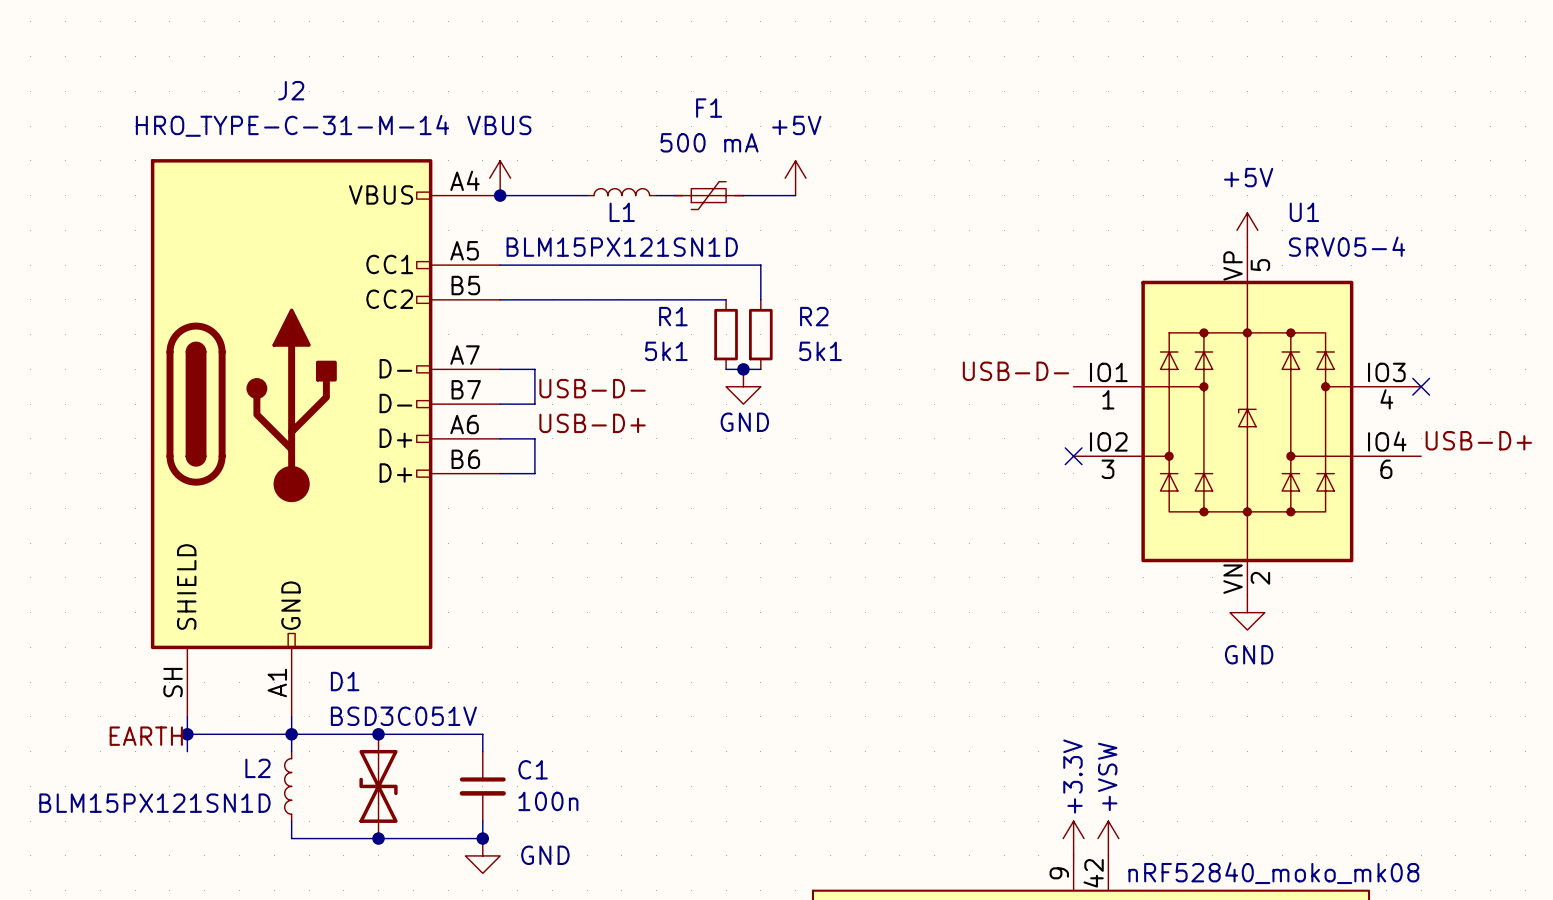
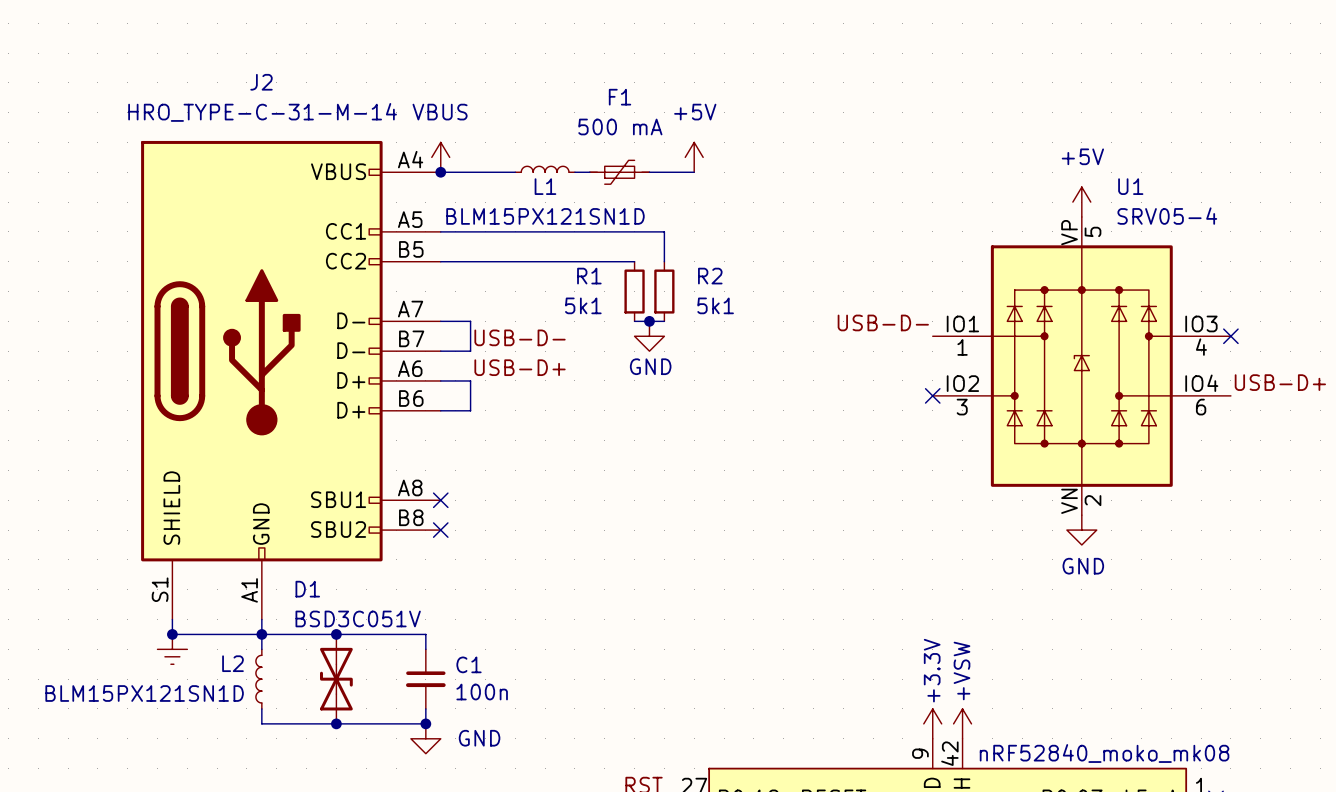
J2 symbol: [150, 159, 501, 717] -> [141, 140, 441, 620]
no-connect mark: none -> (440, 500)
no-connect mark: none -> (440, 530)
label: EARTH (146, 736) -> none
power symbol: none -> (172, 649)

